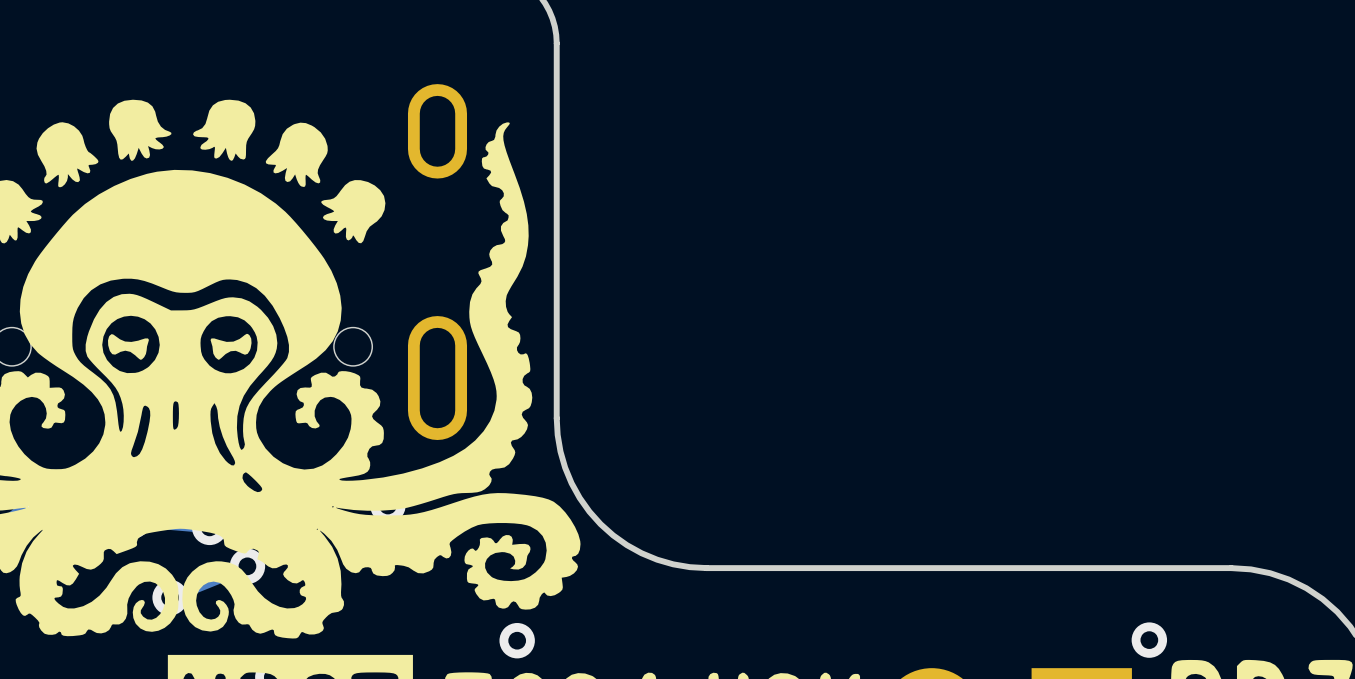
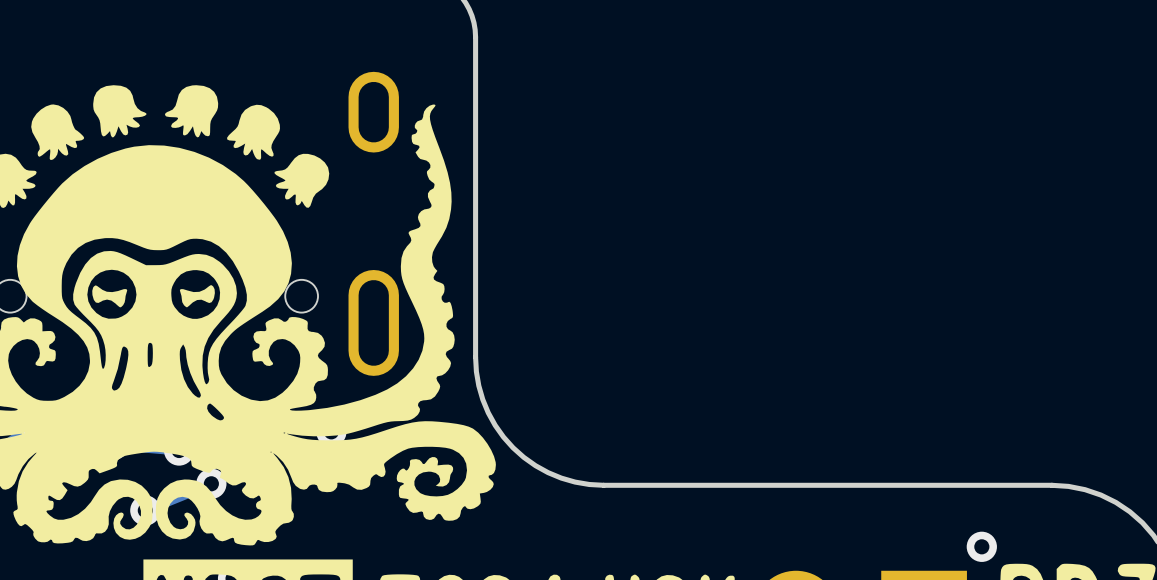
via: (517, 640) -> none

